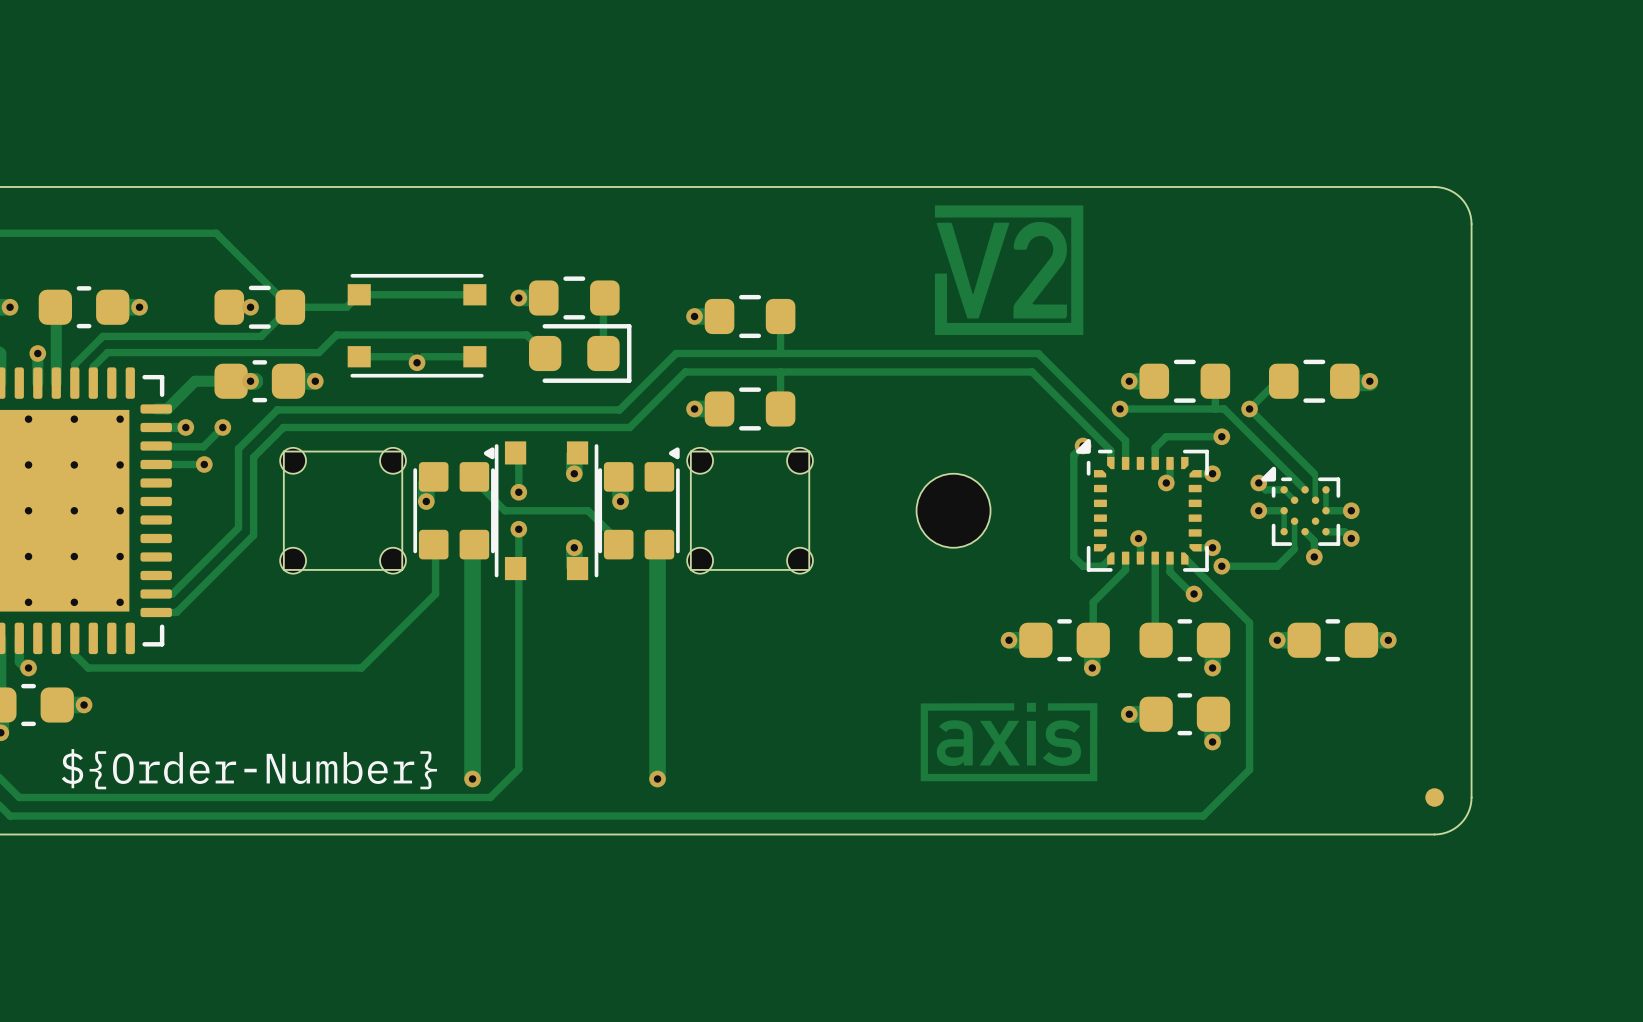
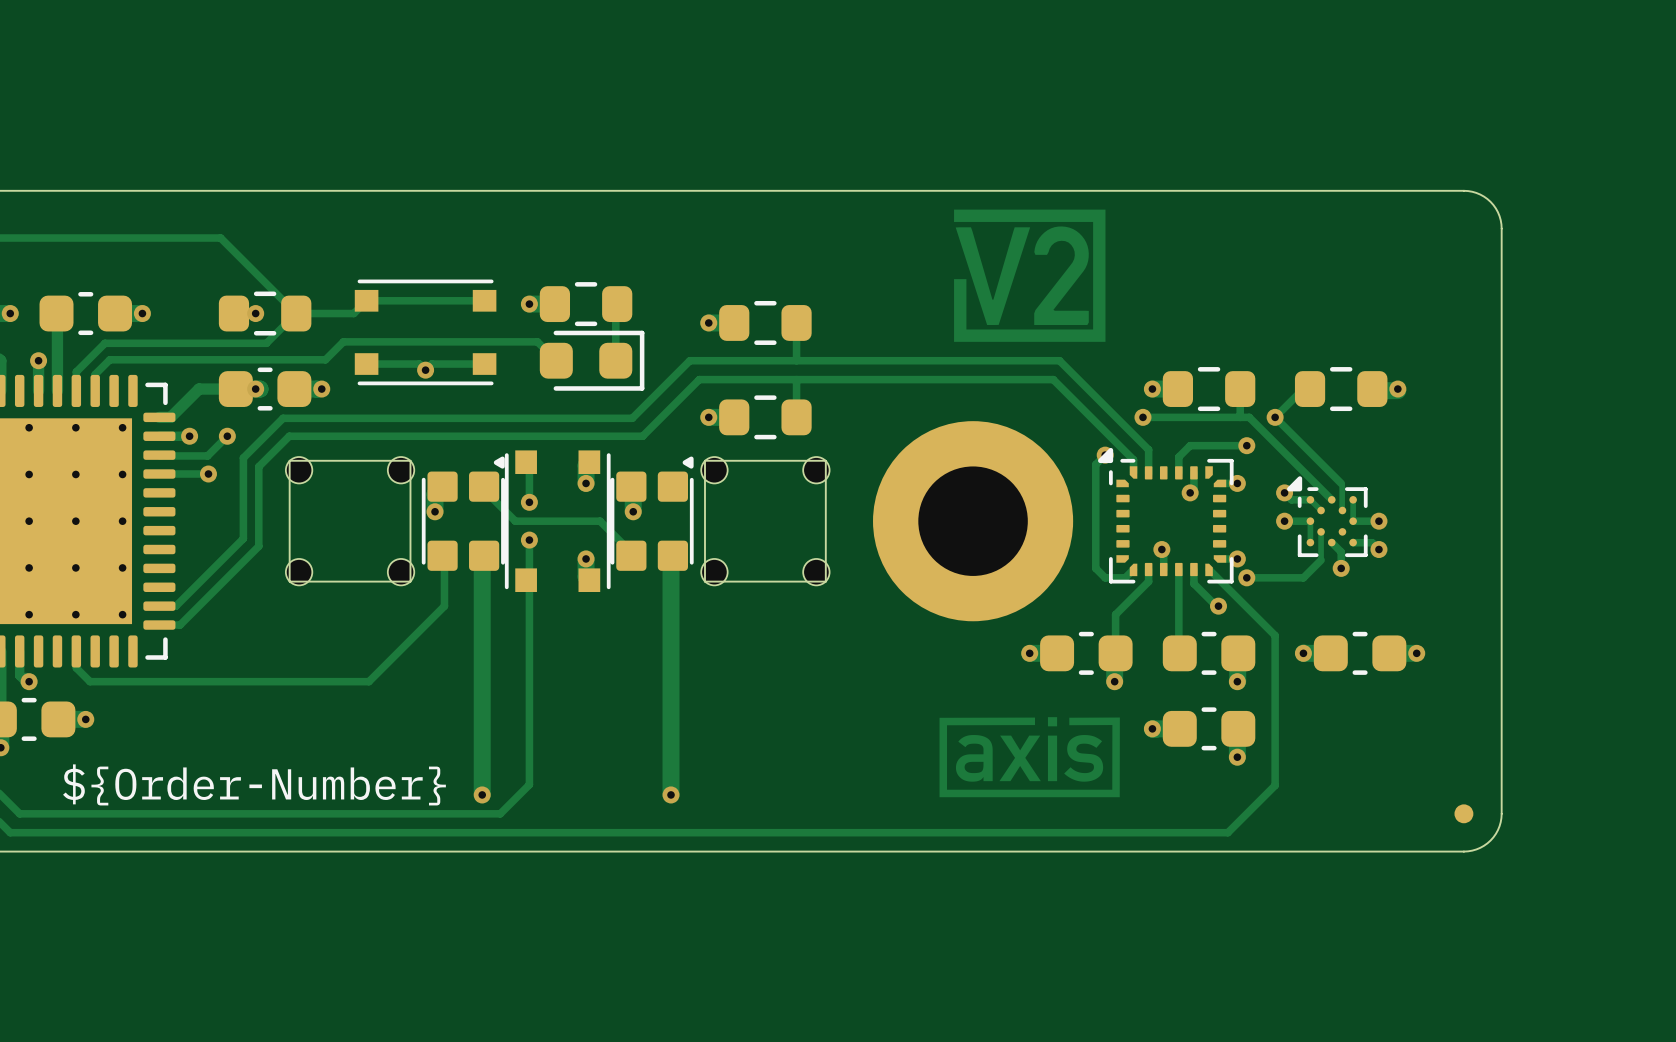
part footprint: [916, 473, 991, 548] -> [873, 421, 1074, 622]

